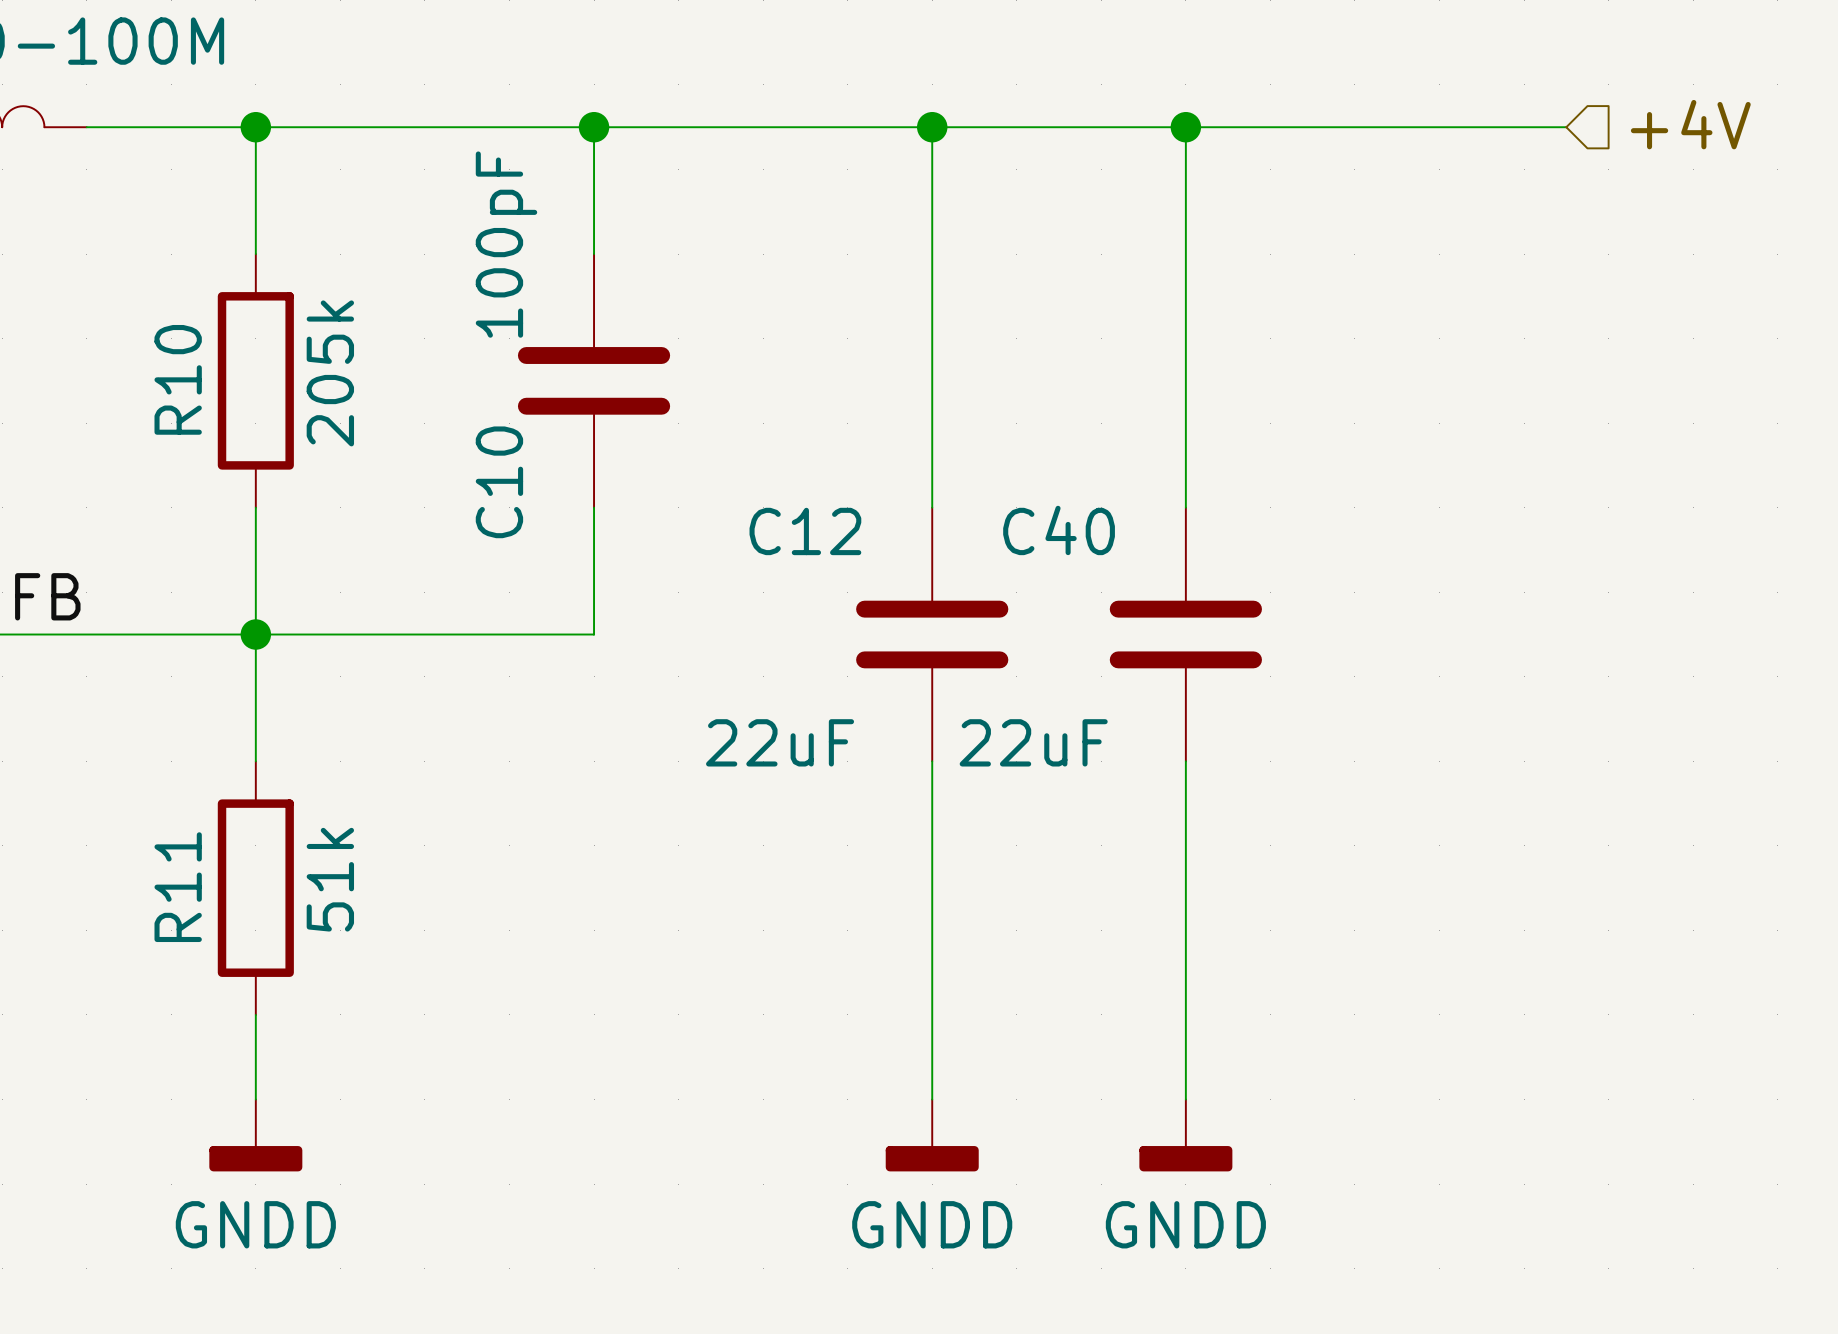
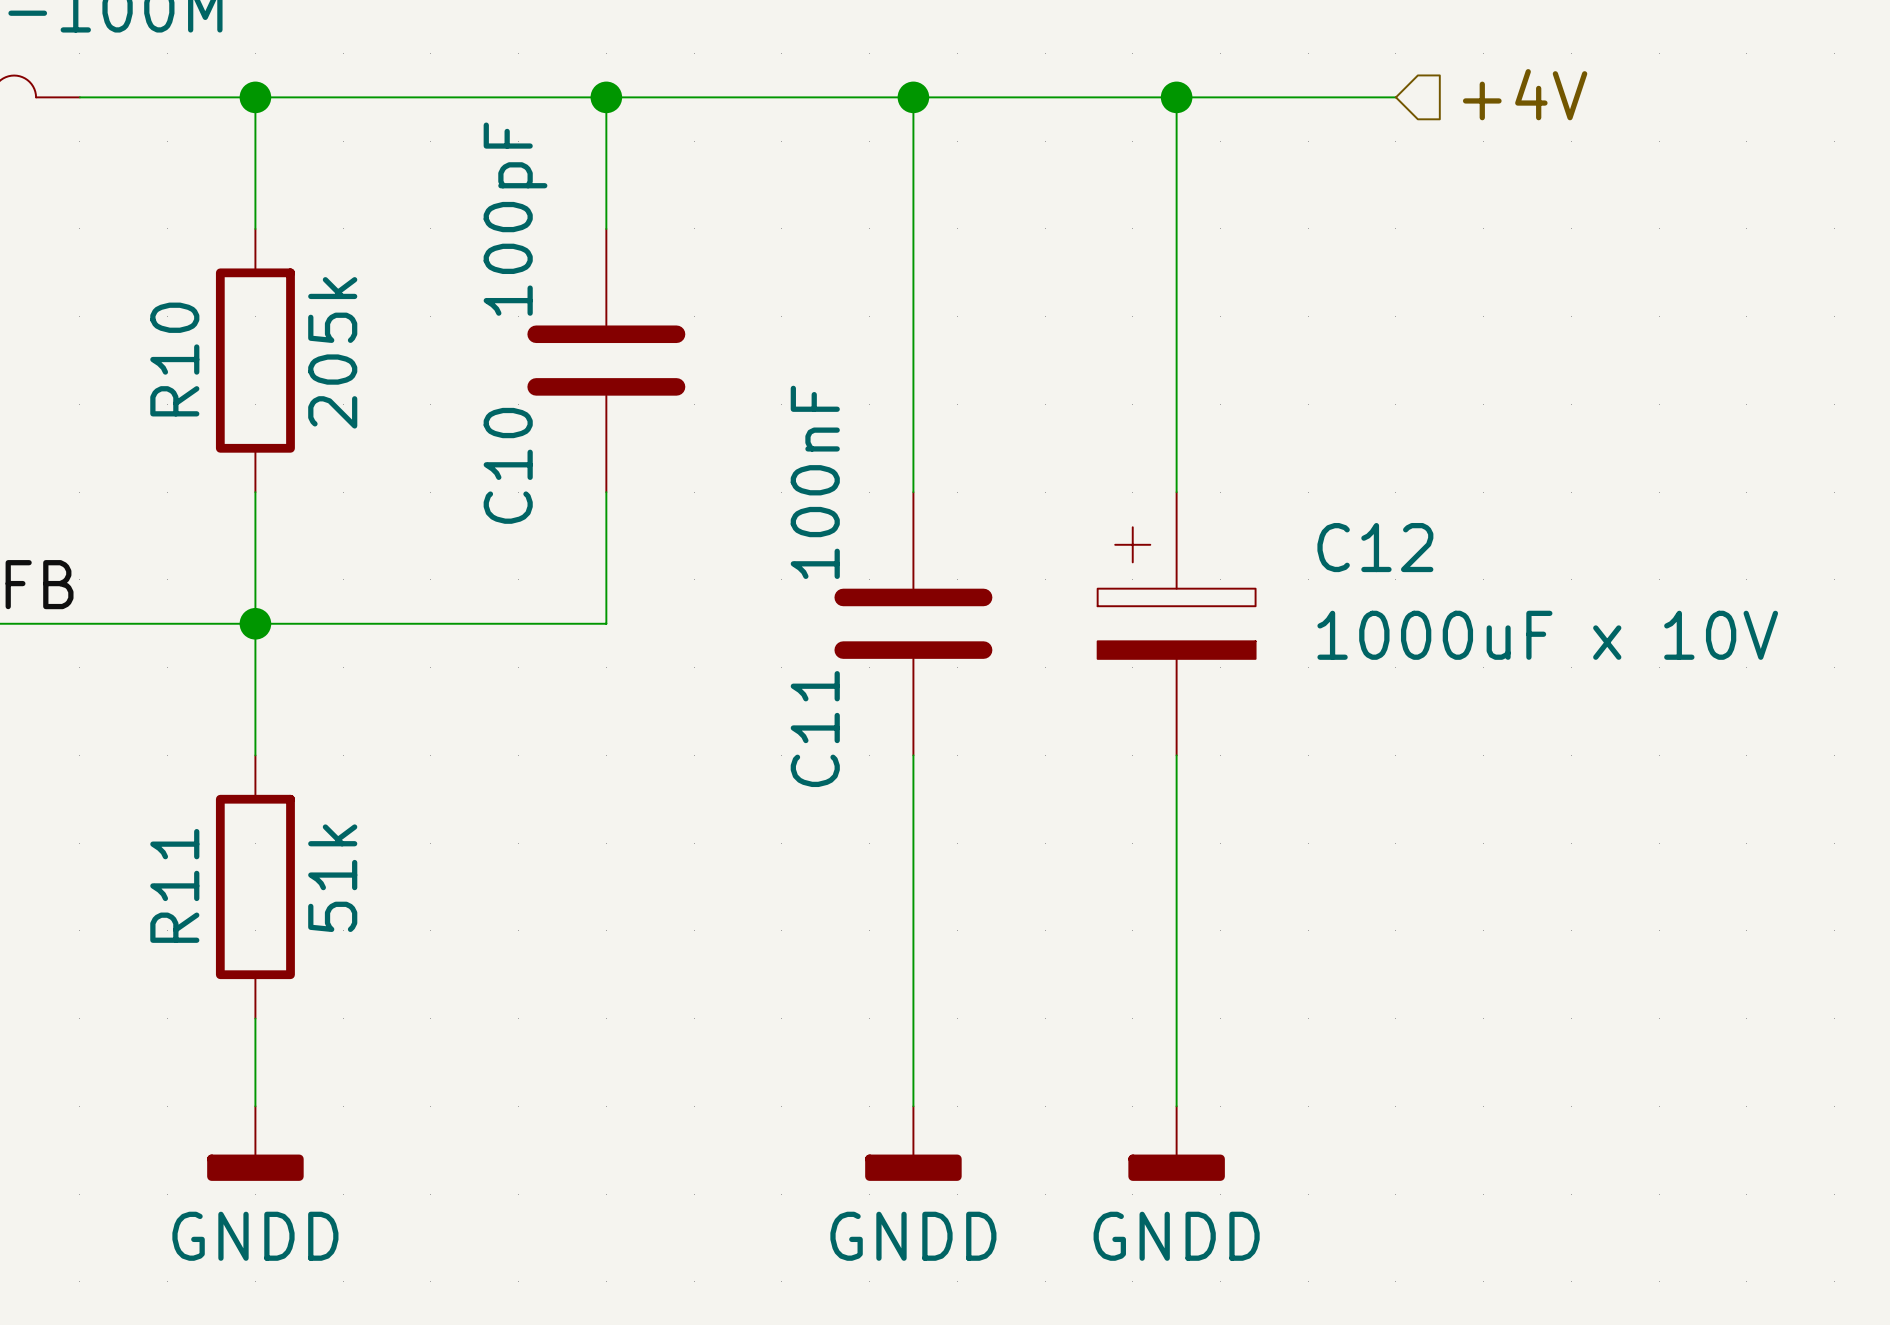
hierarchical label position: +4V (1690, 124) -> +4V (1525, 94)
wire: (932, 127) (932, 507) -> (913, 97) (913, 492)
junction position: (932, 127) -> (913, 97)
wire: (1185, 127) (1185, 507) -> (1176, 97) (1176, 492)
junction position: (1185, 127) -> (1176, 97)
wire: (1354, 127) (1566, 127) -> none
C12 symbol: [856, 507, 1009, 762] -> [1097, 492, 1256, 756]
C12 name position: C12 (805, 531) -> C12 (1375, 547)
C11: none -> 100nF (913, 623)
C40: 22uF (1185, 634) -> none
C12 value: 22uF (780, 742) -> 1000uF x 10V (1547, 635)
wire: (932, 761) (932, 1099) -> (913, 755) (913, 1106)
wire: (1185, 761) (1185, 1099) -> (1176, 755) (1176, 1106)
power symbol position: GNDD (932, 1135) -> GNDD (913, 1143)
power symbol position: GNDD (1185, 1135) -> GNDD (1176, 1143)

